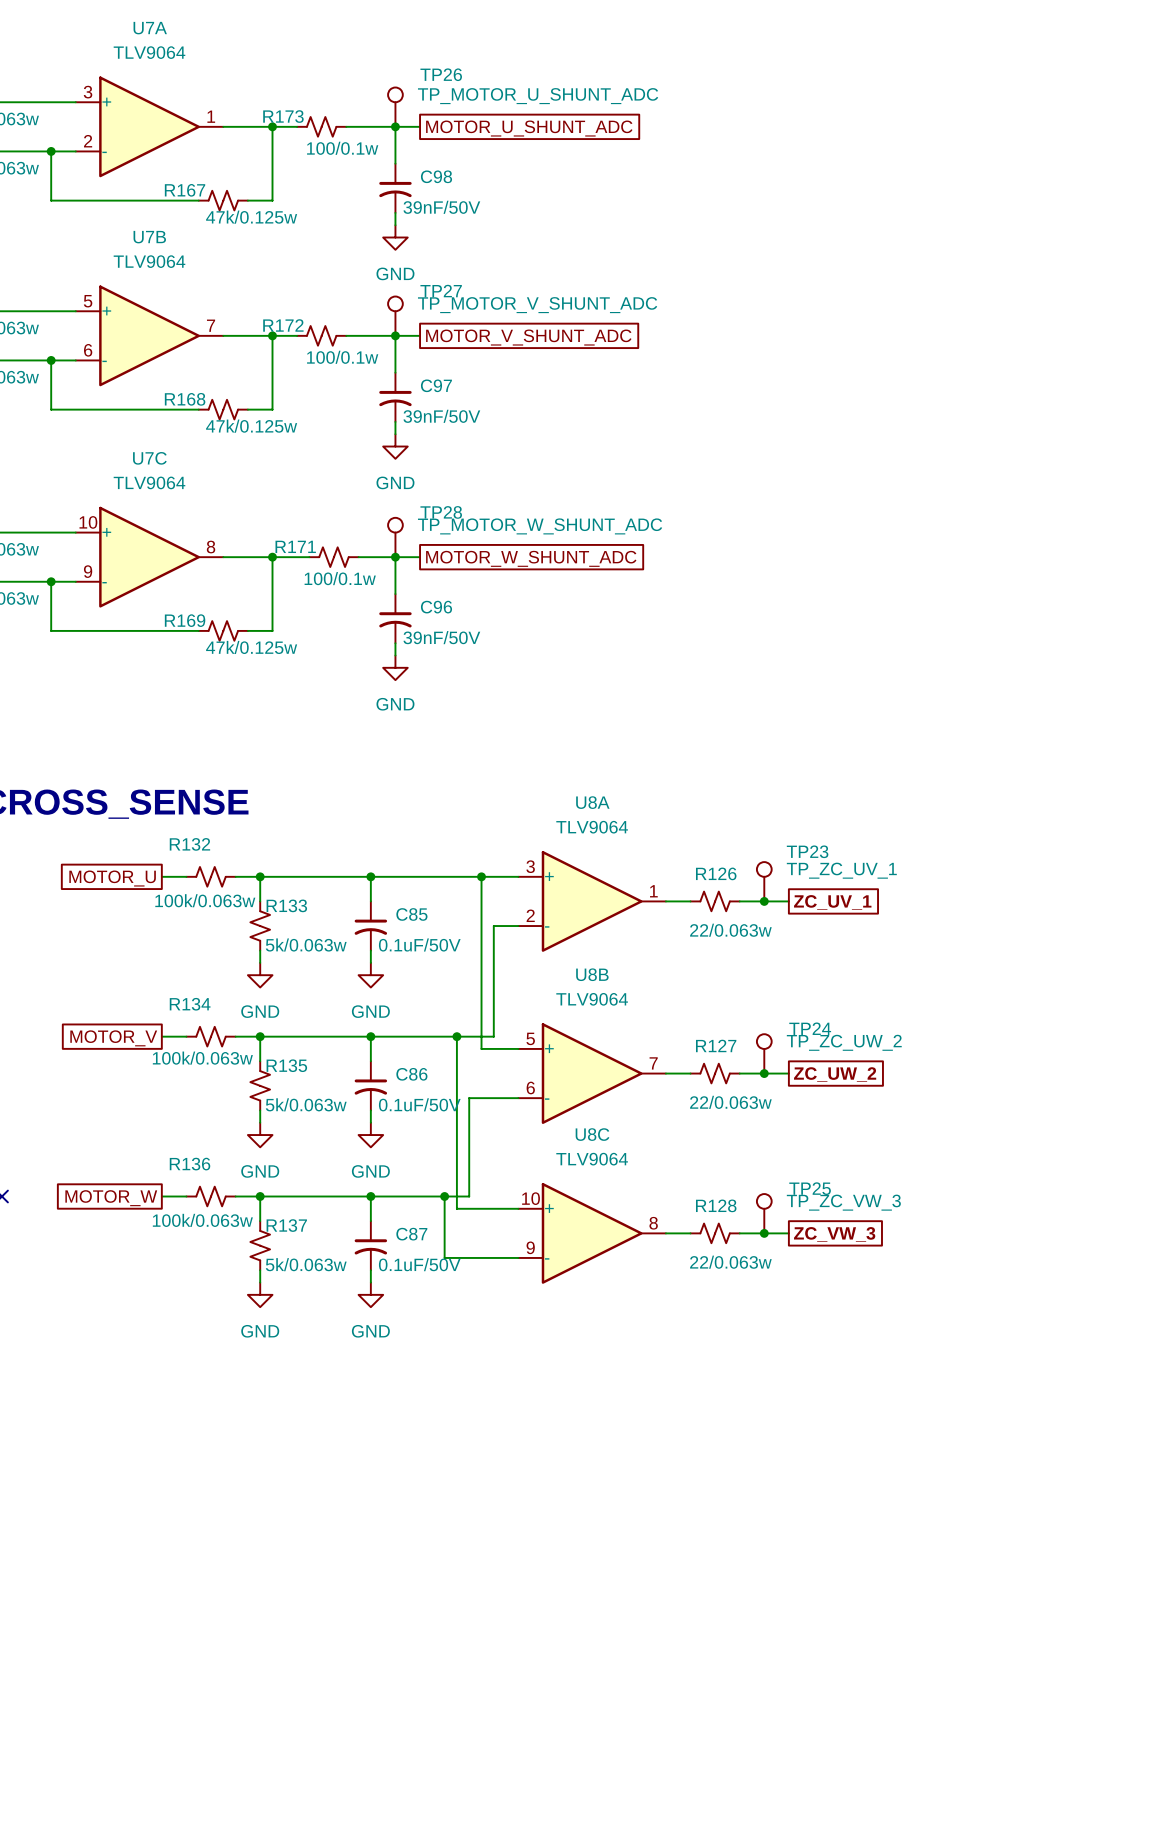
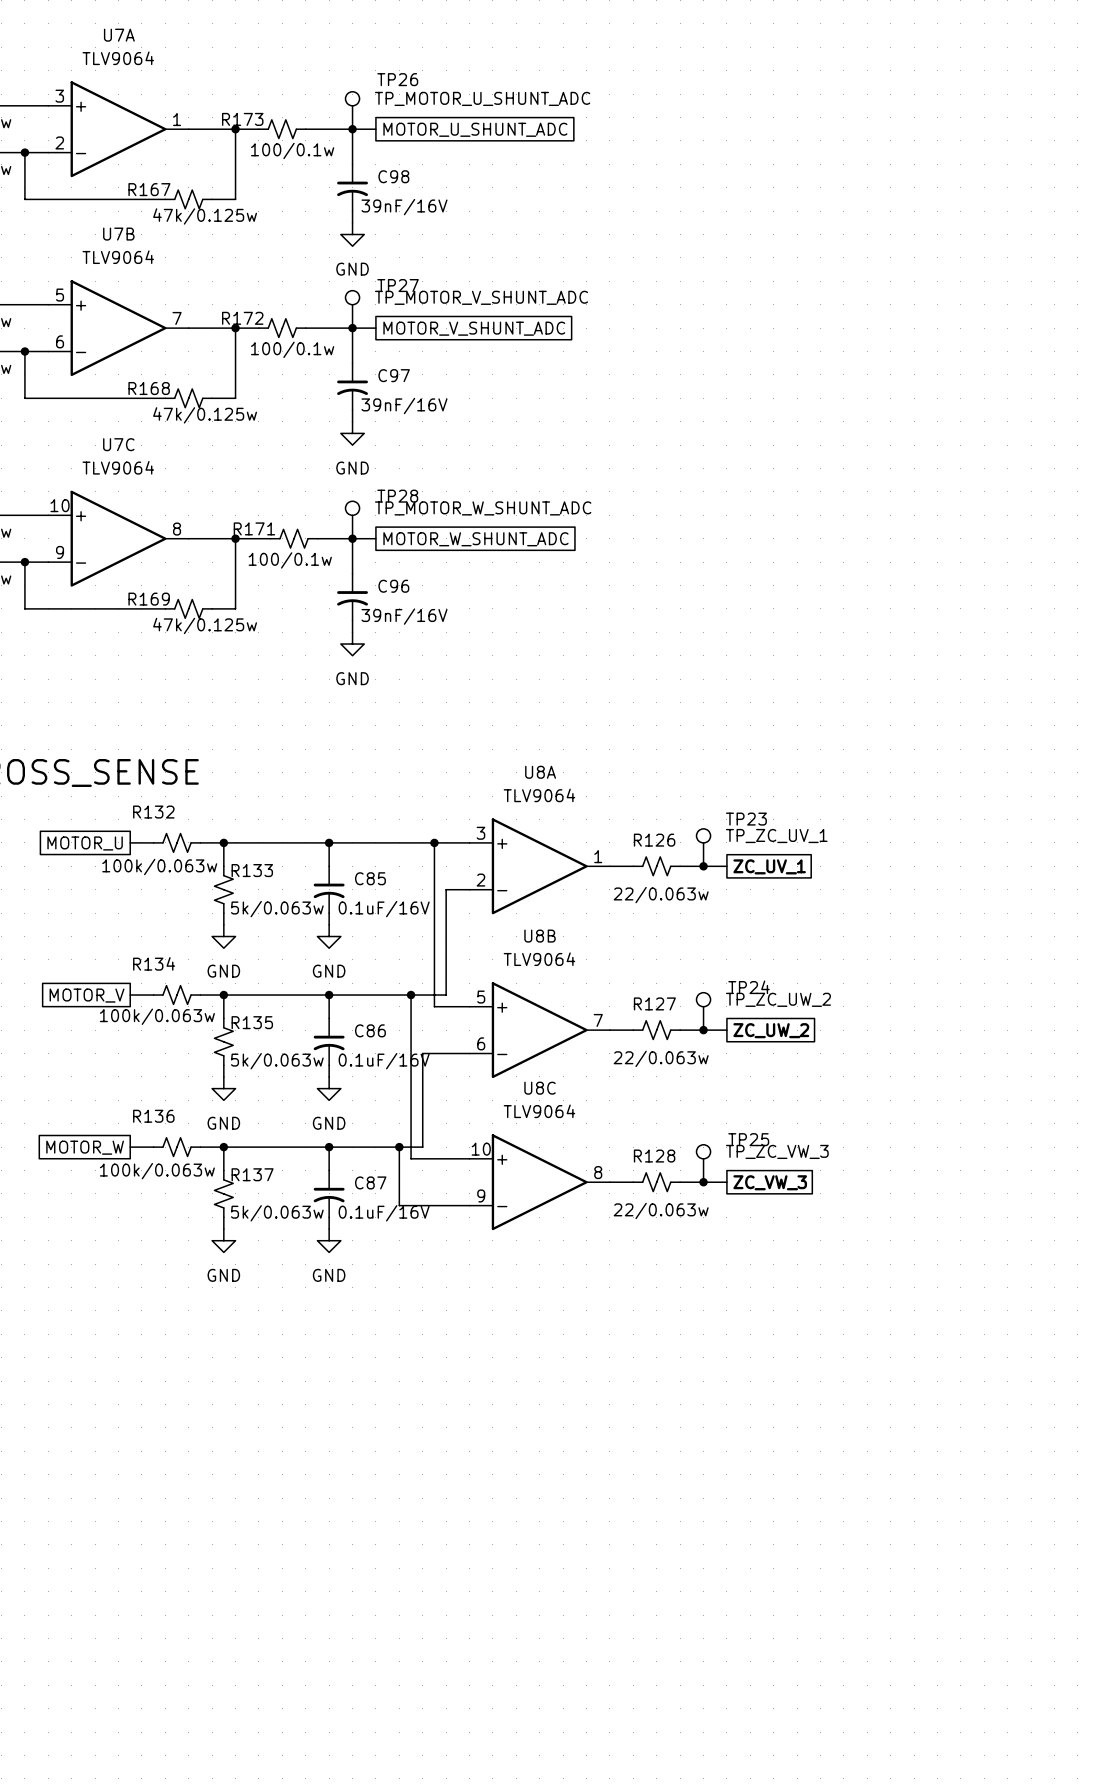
C98 value: 39nF/50V (441, 207) -> 39nF/16V (404, 207)
C97 value: 39nF/50V (441, 416) -> 39nF/16V (404, 406)
C96 value: 39nF/50V (441, 637) -> 39nF/16V (404, 616)
C85 value: 0.1uF/50V (419, 944) -> 0.1uF/16V (384, 909)
C86 value: 0.1uF/50V (419, 1104) -> 0.1uF/16V (384, 1061)
C87 value: 0.1uF/50V (419, 1264) -> 0.1uF/16V (384, 1213)

